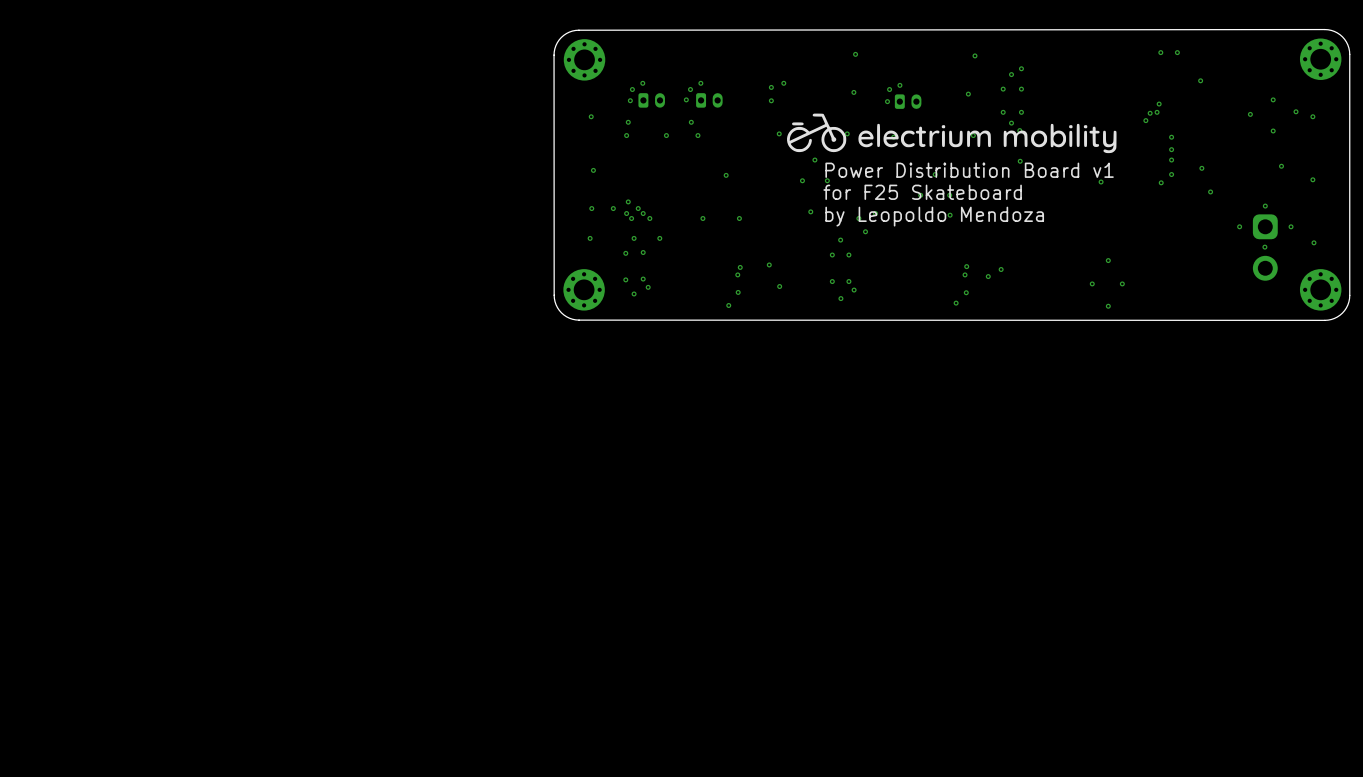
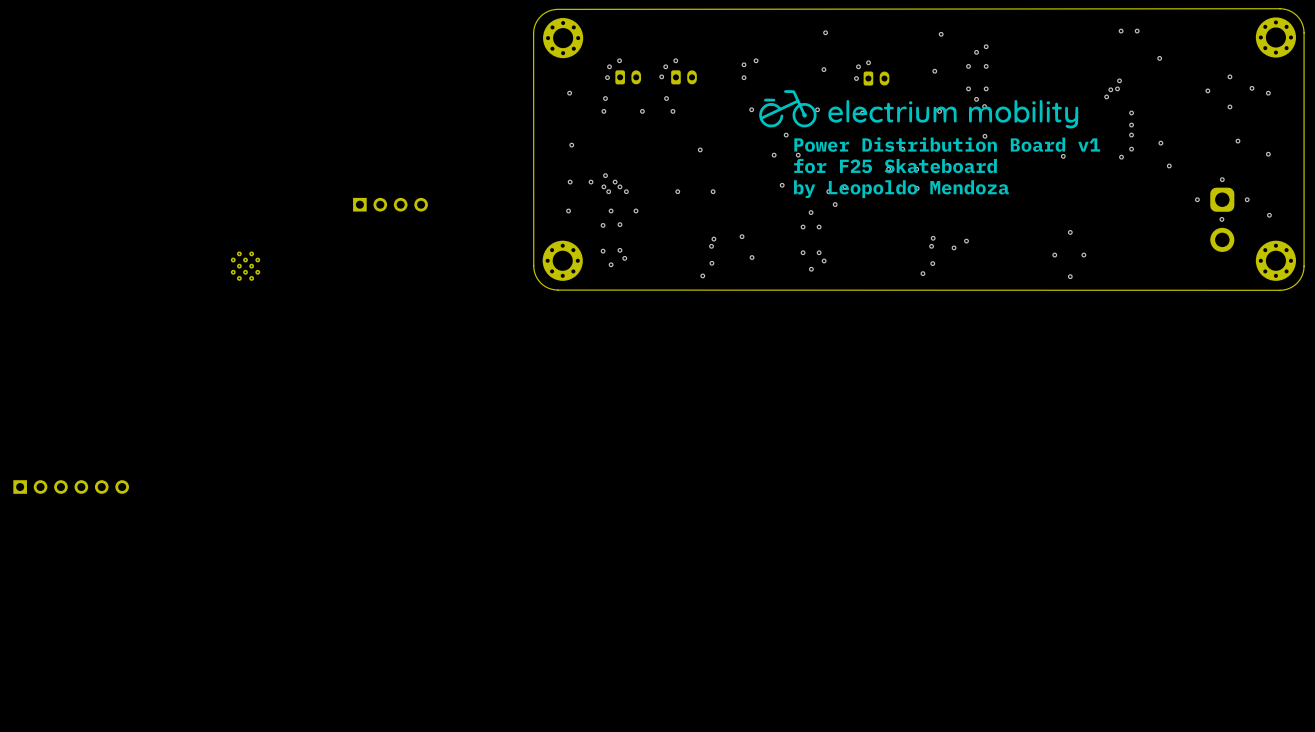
part: none -> (390, 204)
part: none -> (245, 266)
part: none -> (71, 487)

